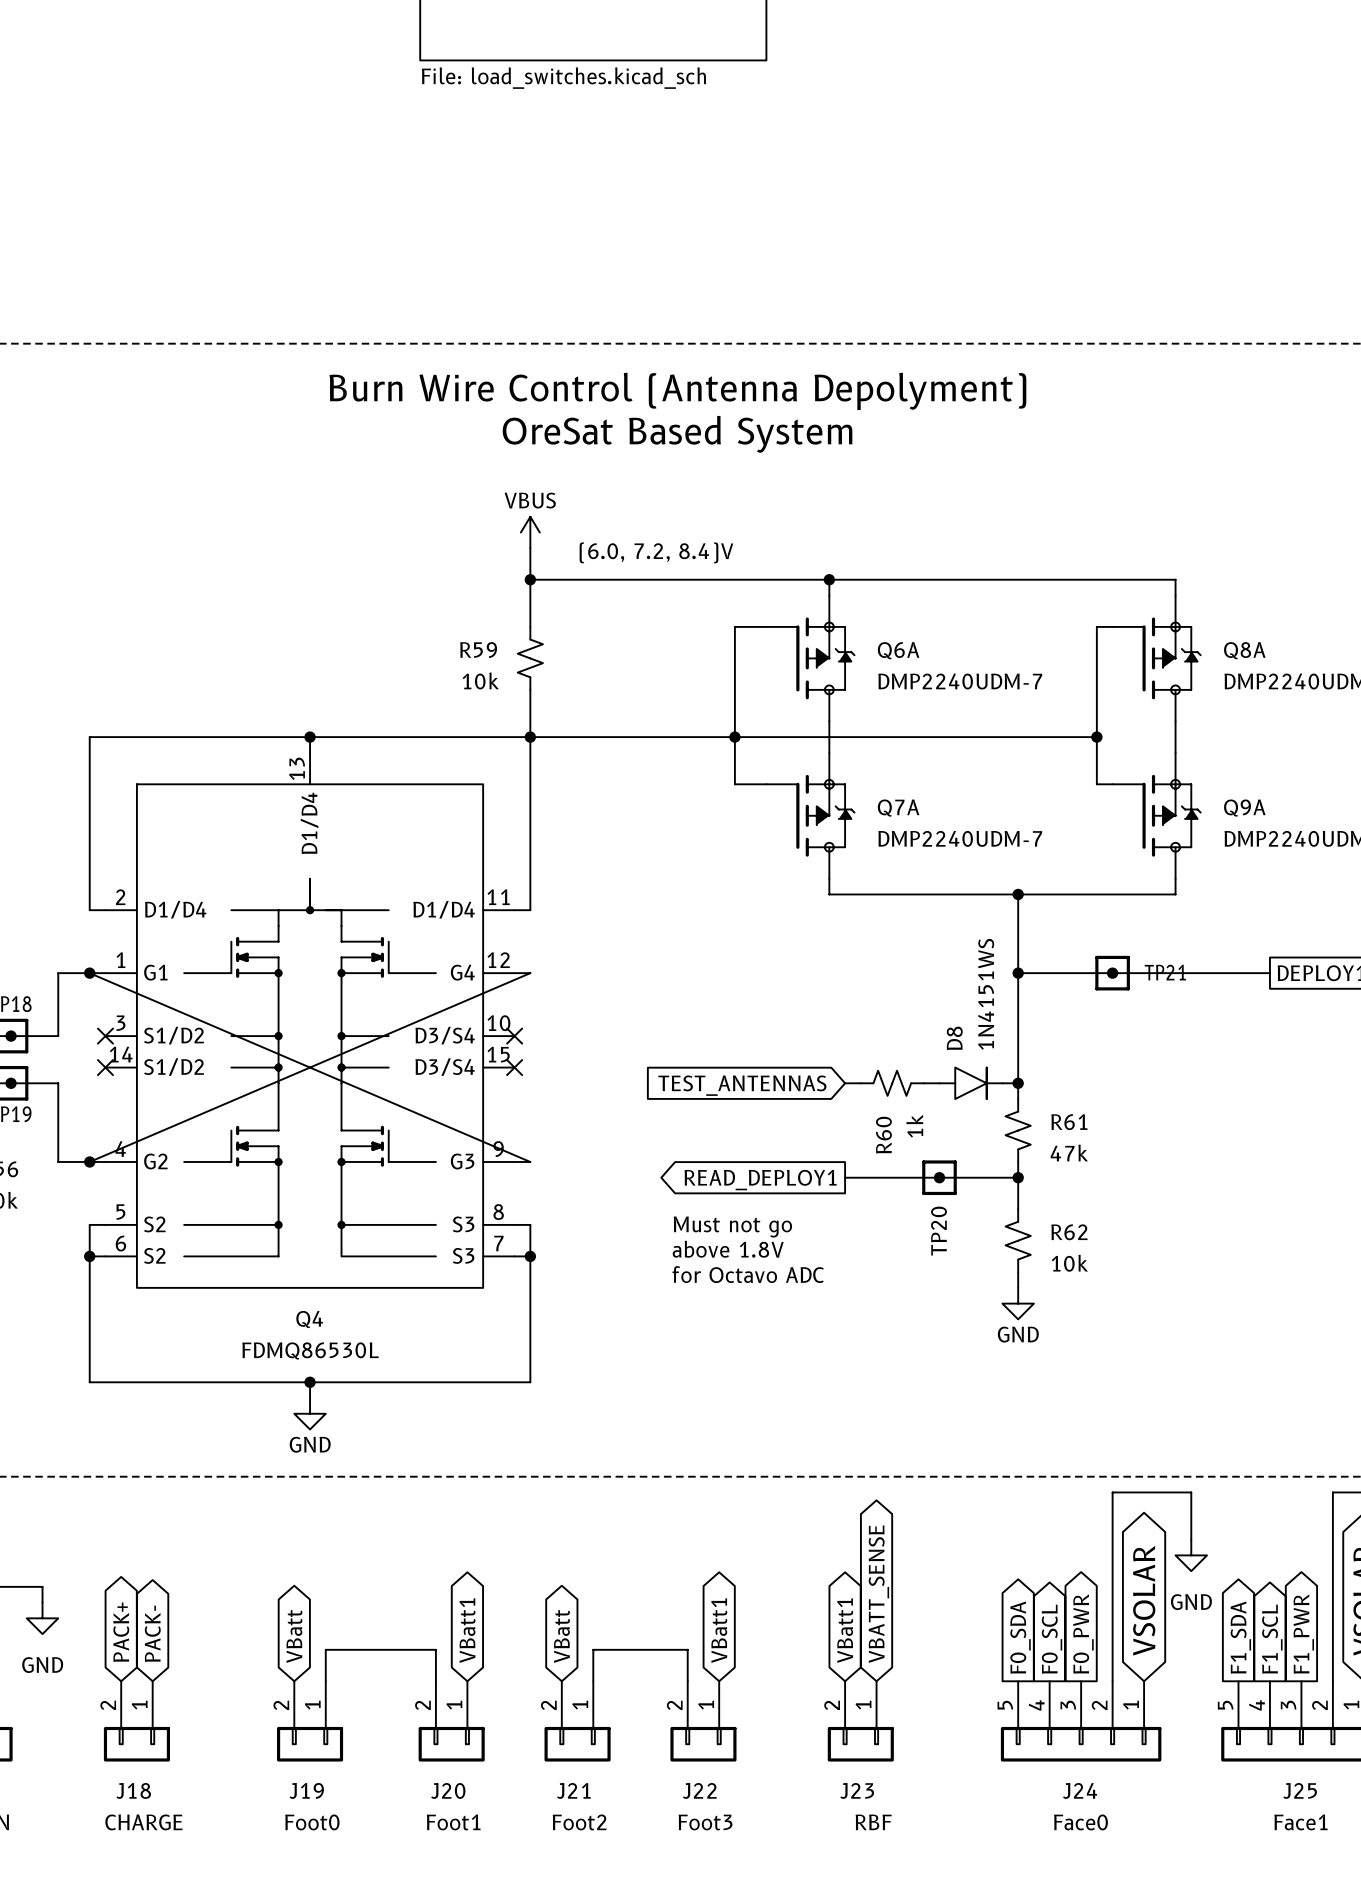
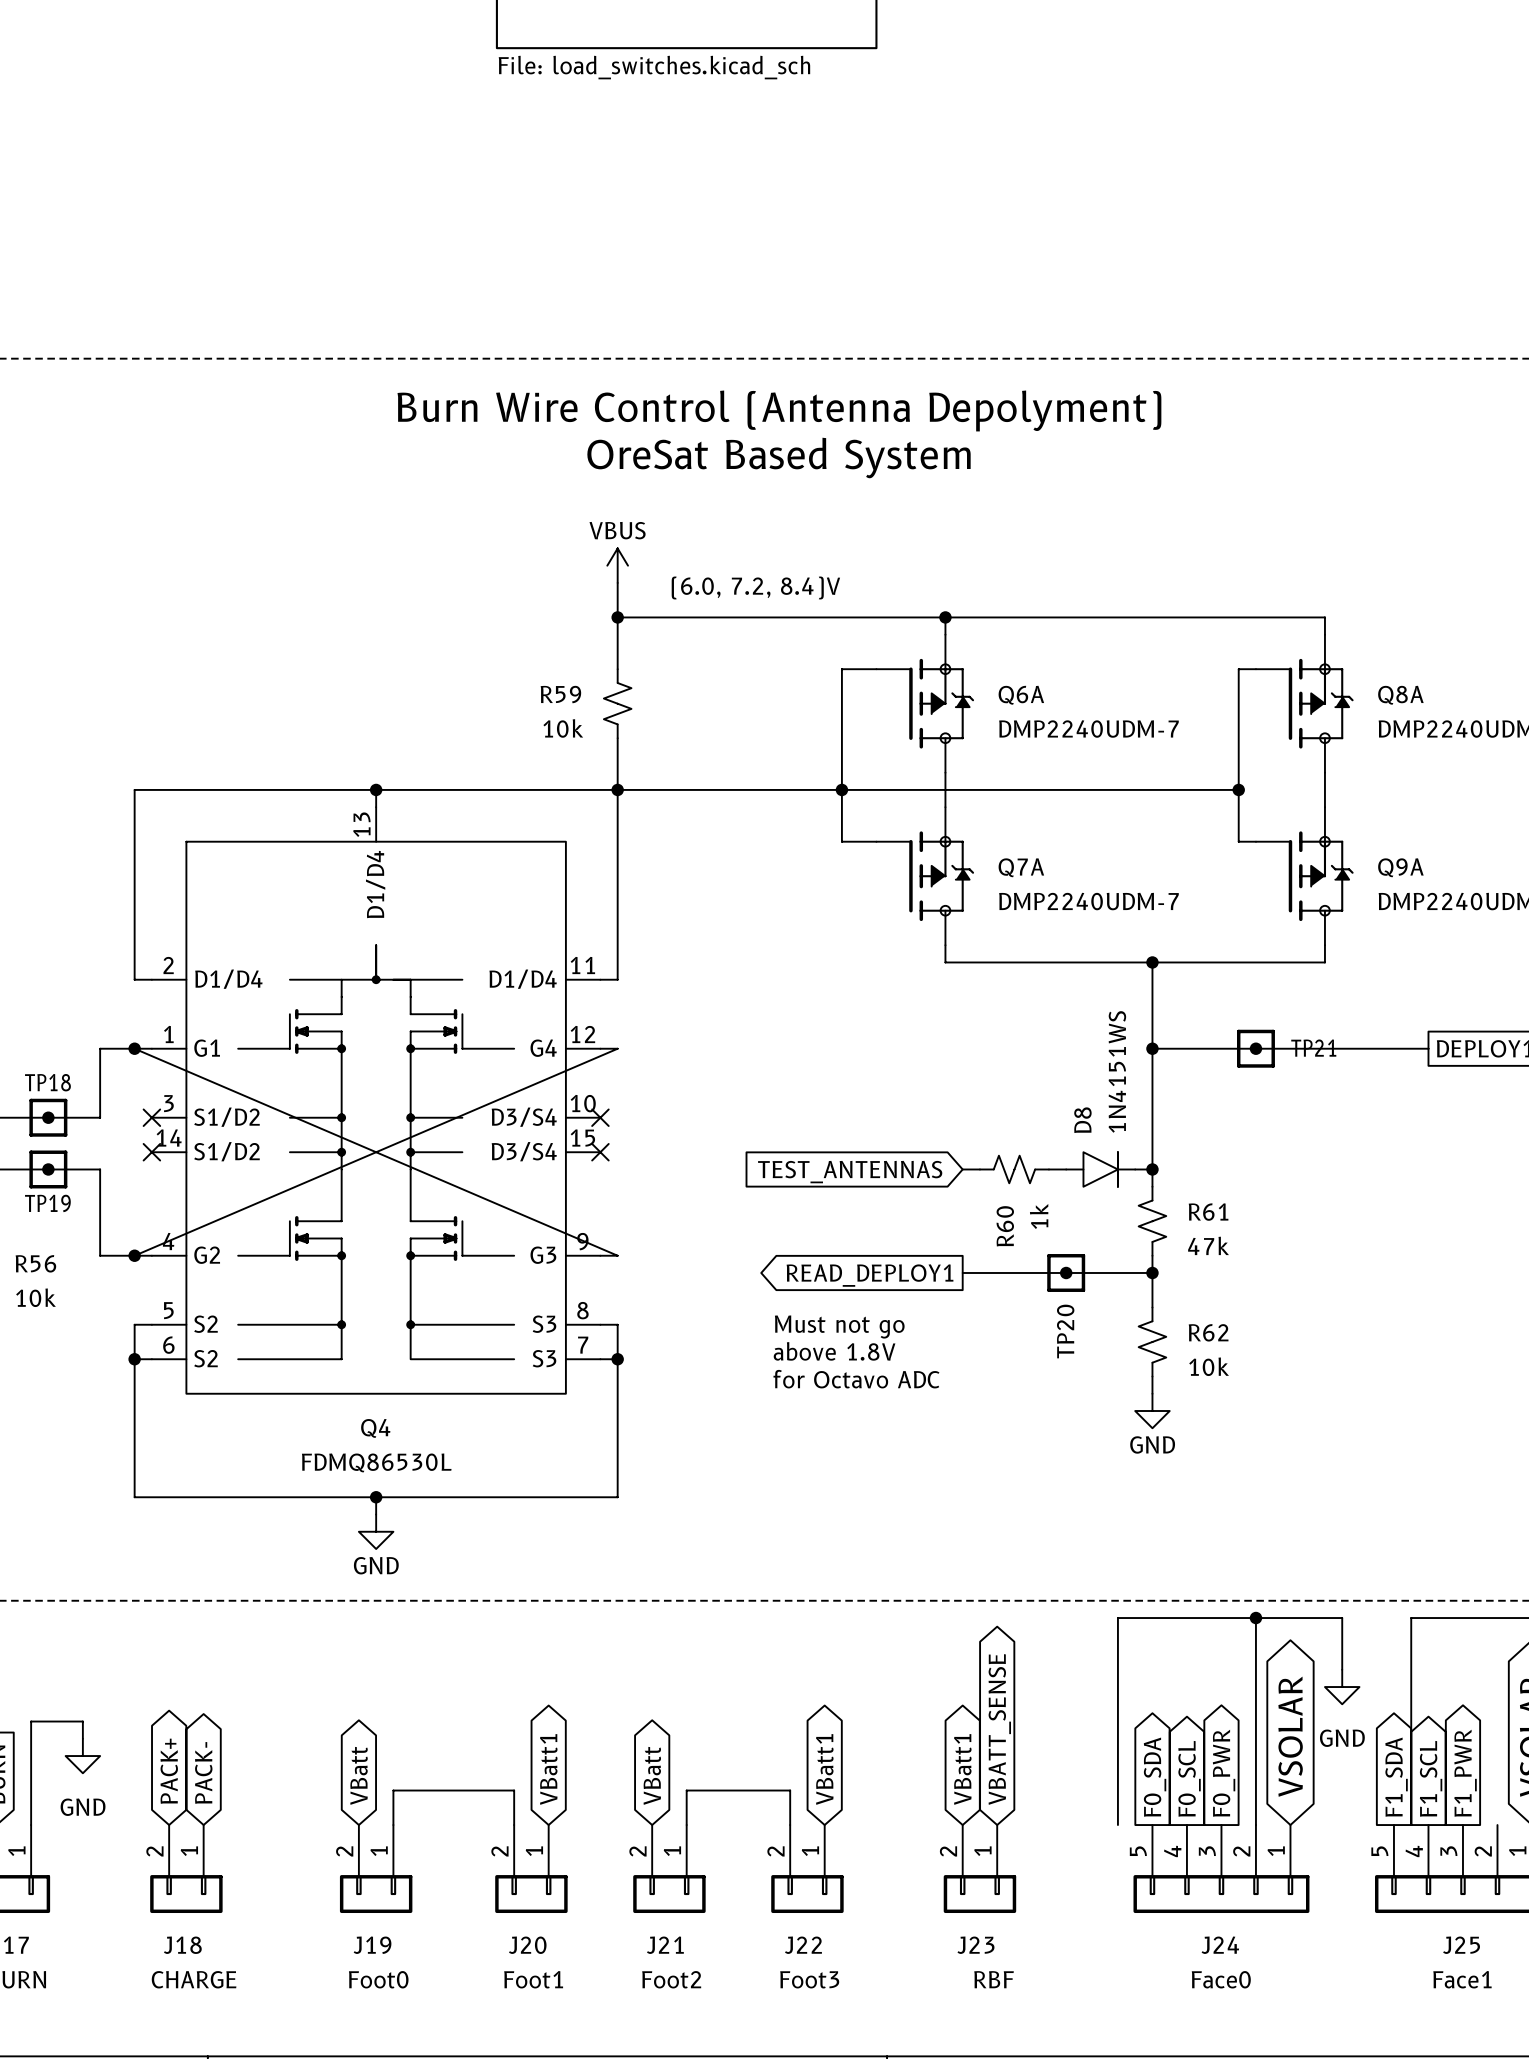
wire: none -> (1255, 1618) (1117, 1618) (1117, 1825)
junction: none -> (1255, 1618)
wire: (1332, 1492) (1332, 1681) -> (1497, 1618) (1411, 1618) (1411, 1825)

